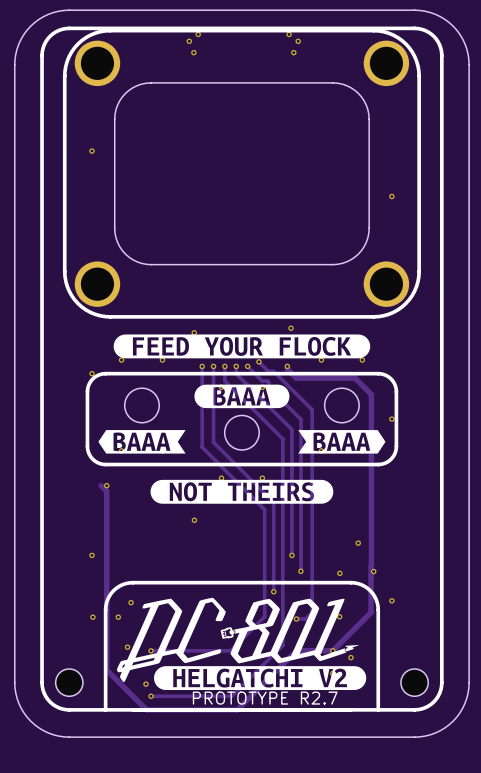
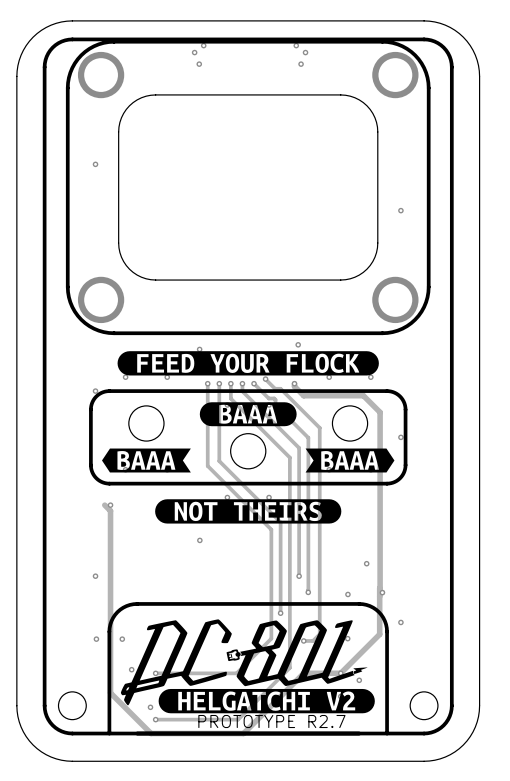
via: (131, 602) -> none

